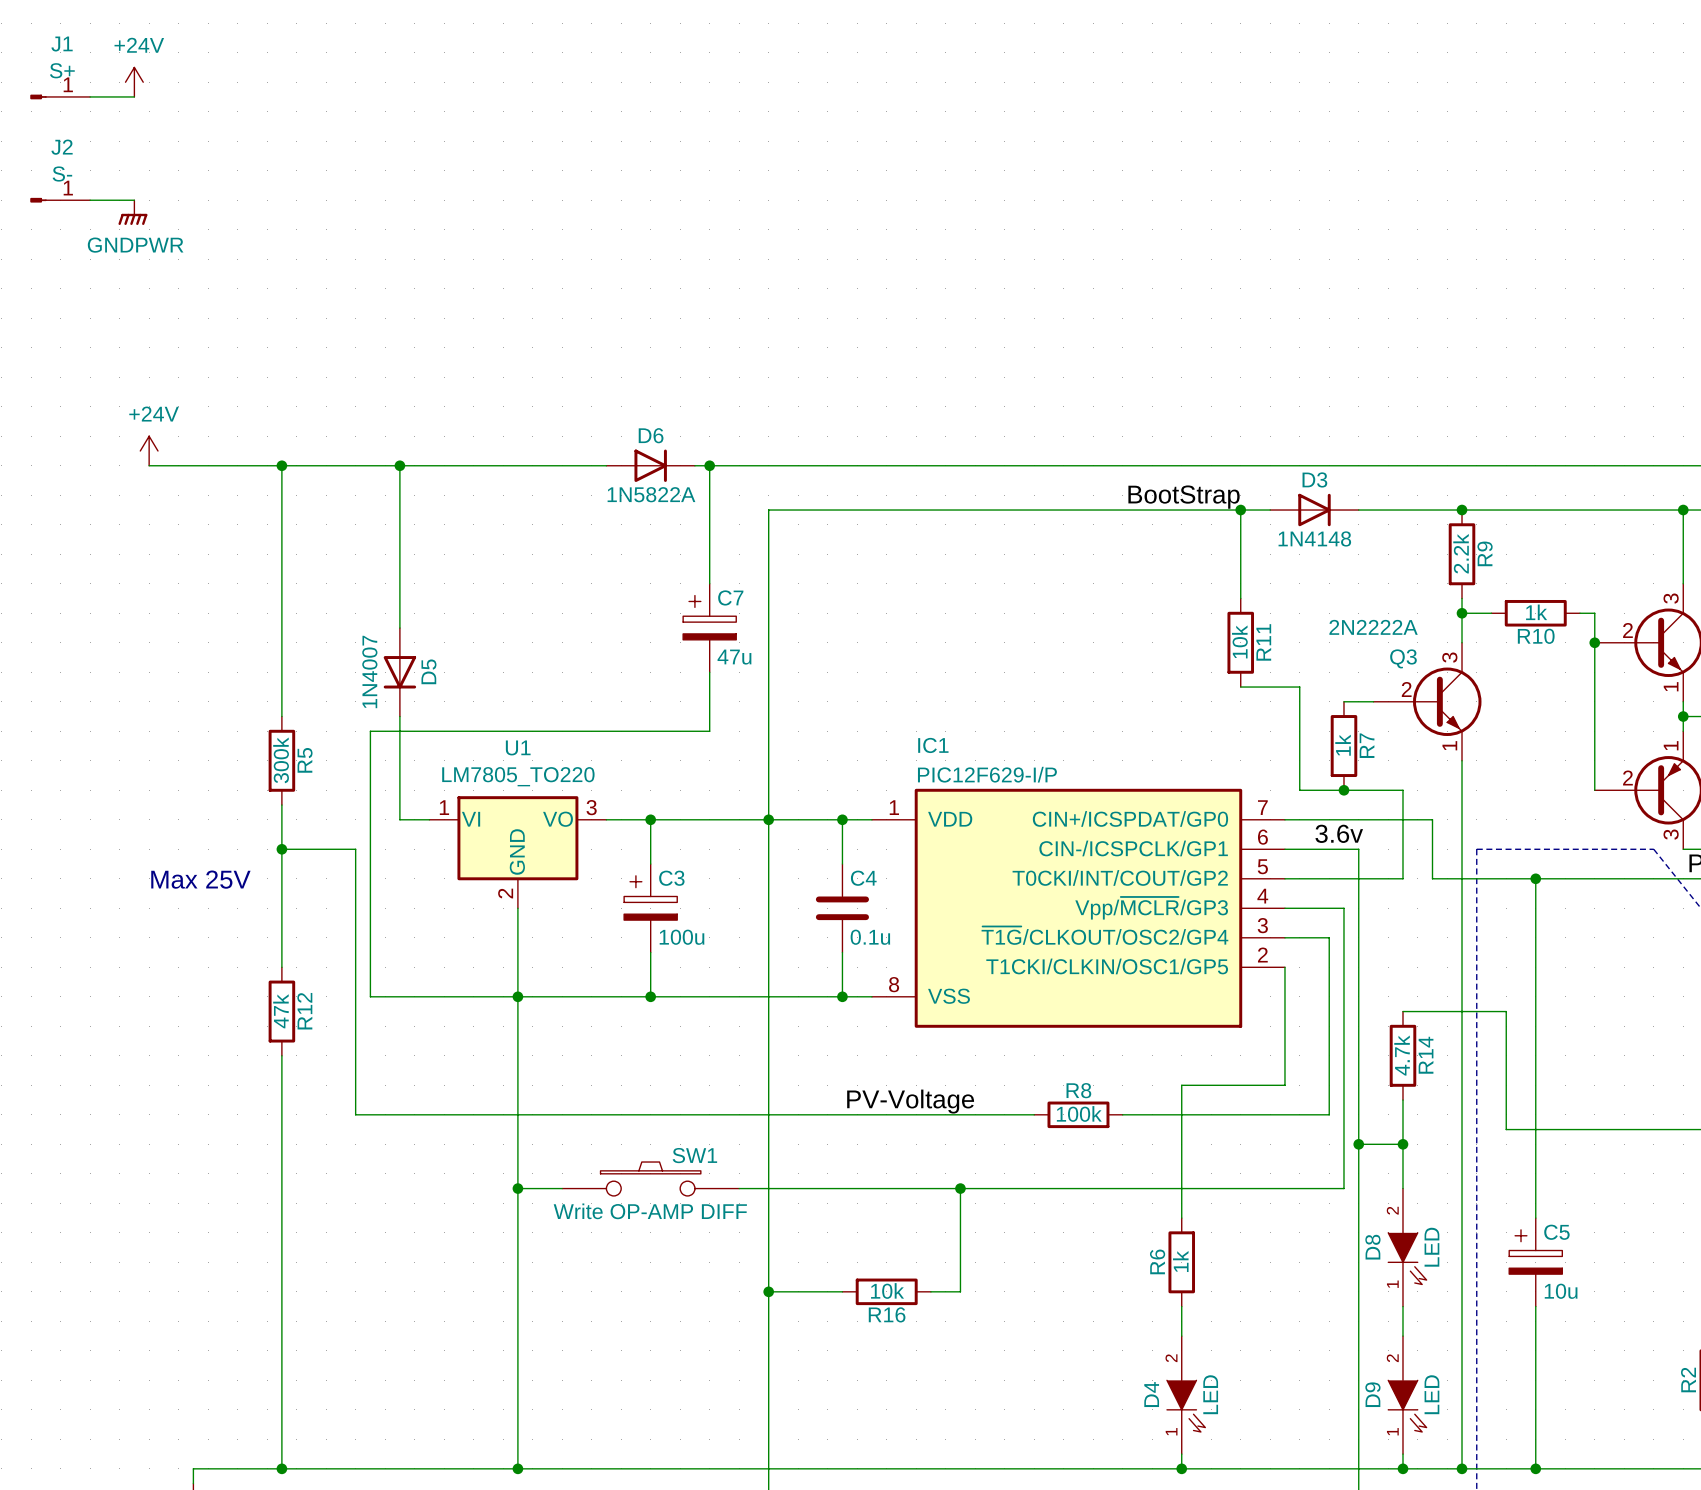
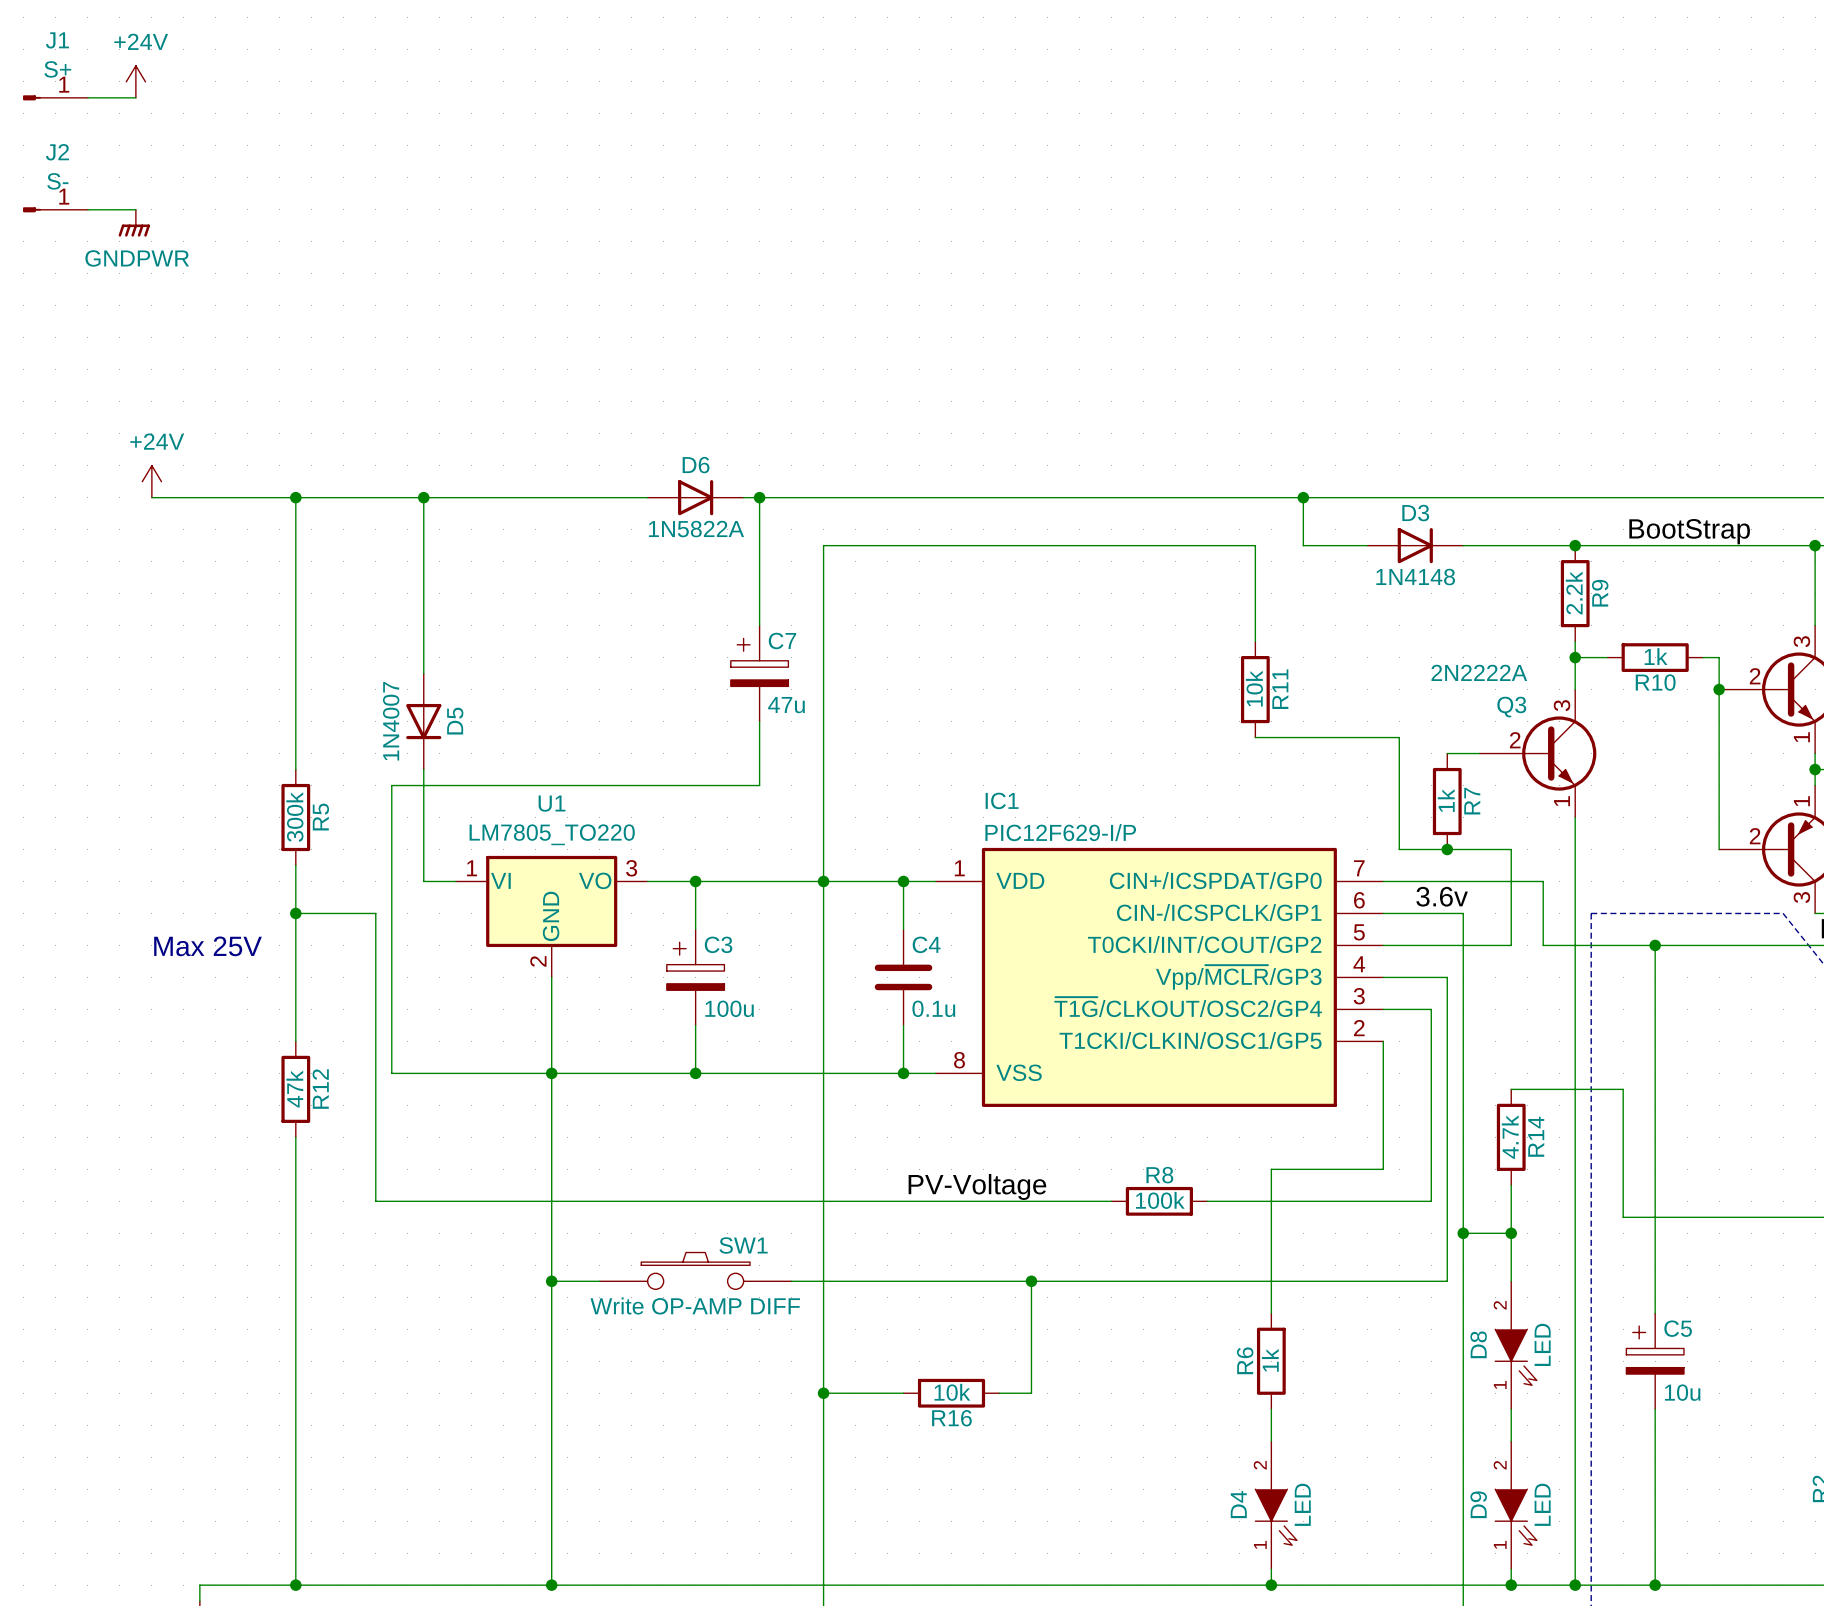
label: BootStrap (1184, 497) -> none
label: none -> BootStrap (1689, 531)
wire: (1166, 510) (1211, 510) -> (1303, 497) (1303, 545)
wire: (1240, 510) (1240, 598) -> (1255, 545) (1255, 641)
junction position: (1240, 510) -> (1303, 497)
R11 position: (1240, 642) -> (1255, 689)
wire: none -> (1255, 737) (1335, 737)

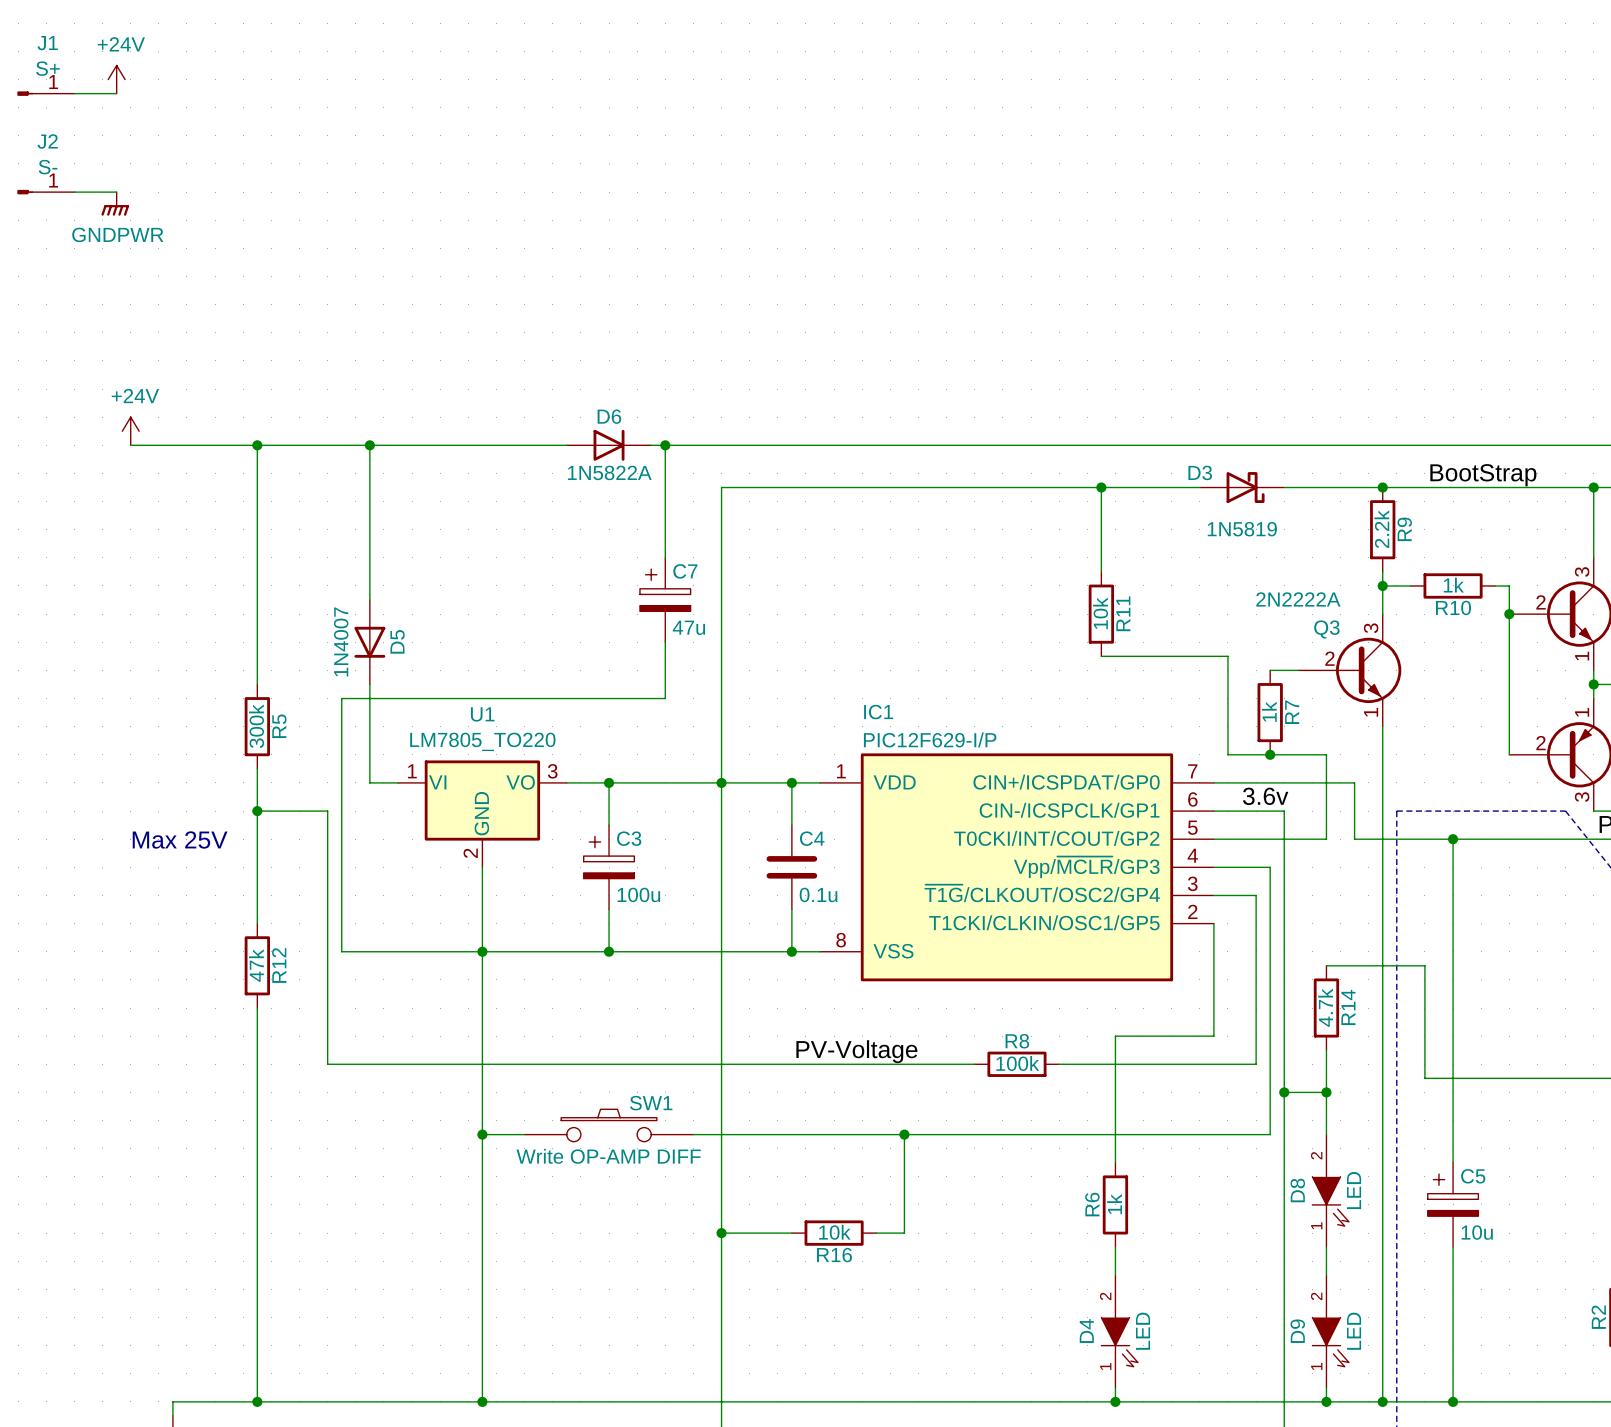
wire: (1303, 497) (1303, 545) -> (1101, 487) (1143, 487)
junction position: (1303, 497) -> (1101, 487)
D3 name position: D3 (1415, 513) -> D3 (1200, 472)
D3 symbol: [1367, 528, 1464, 564] -> [1199, 472, 1285, 503]
D3 value: 1N4148 (1415, 577) -> 1N5819 (1242, 529)

